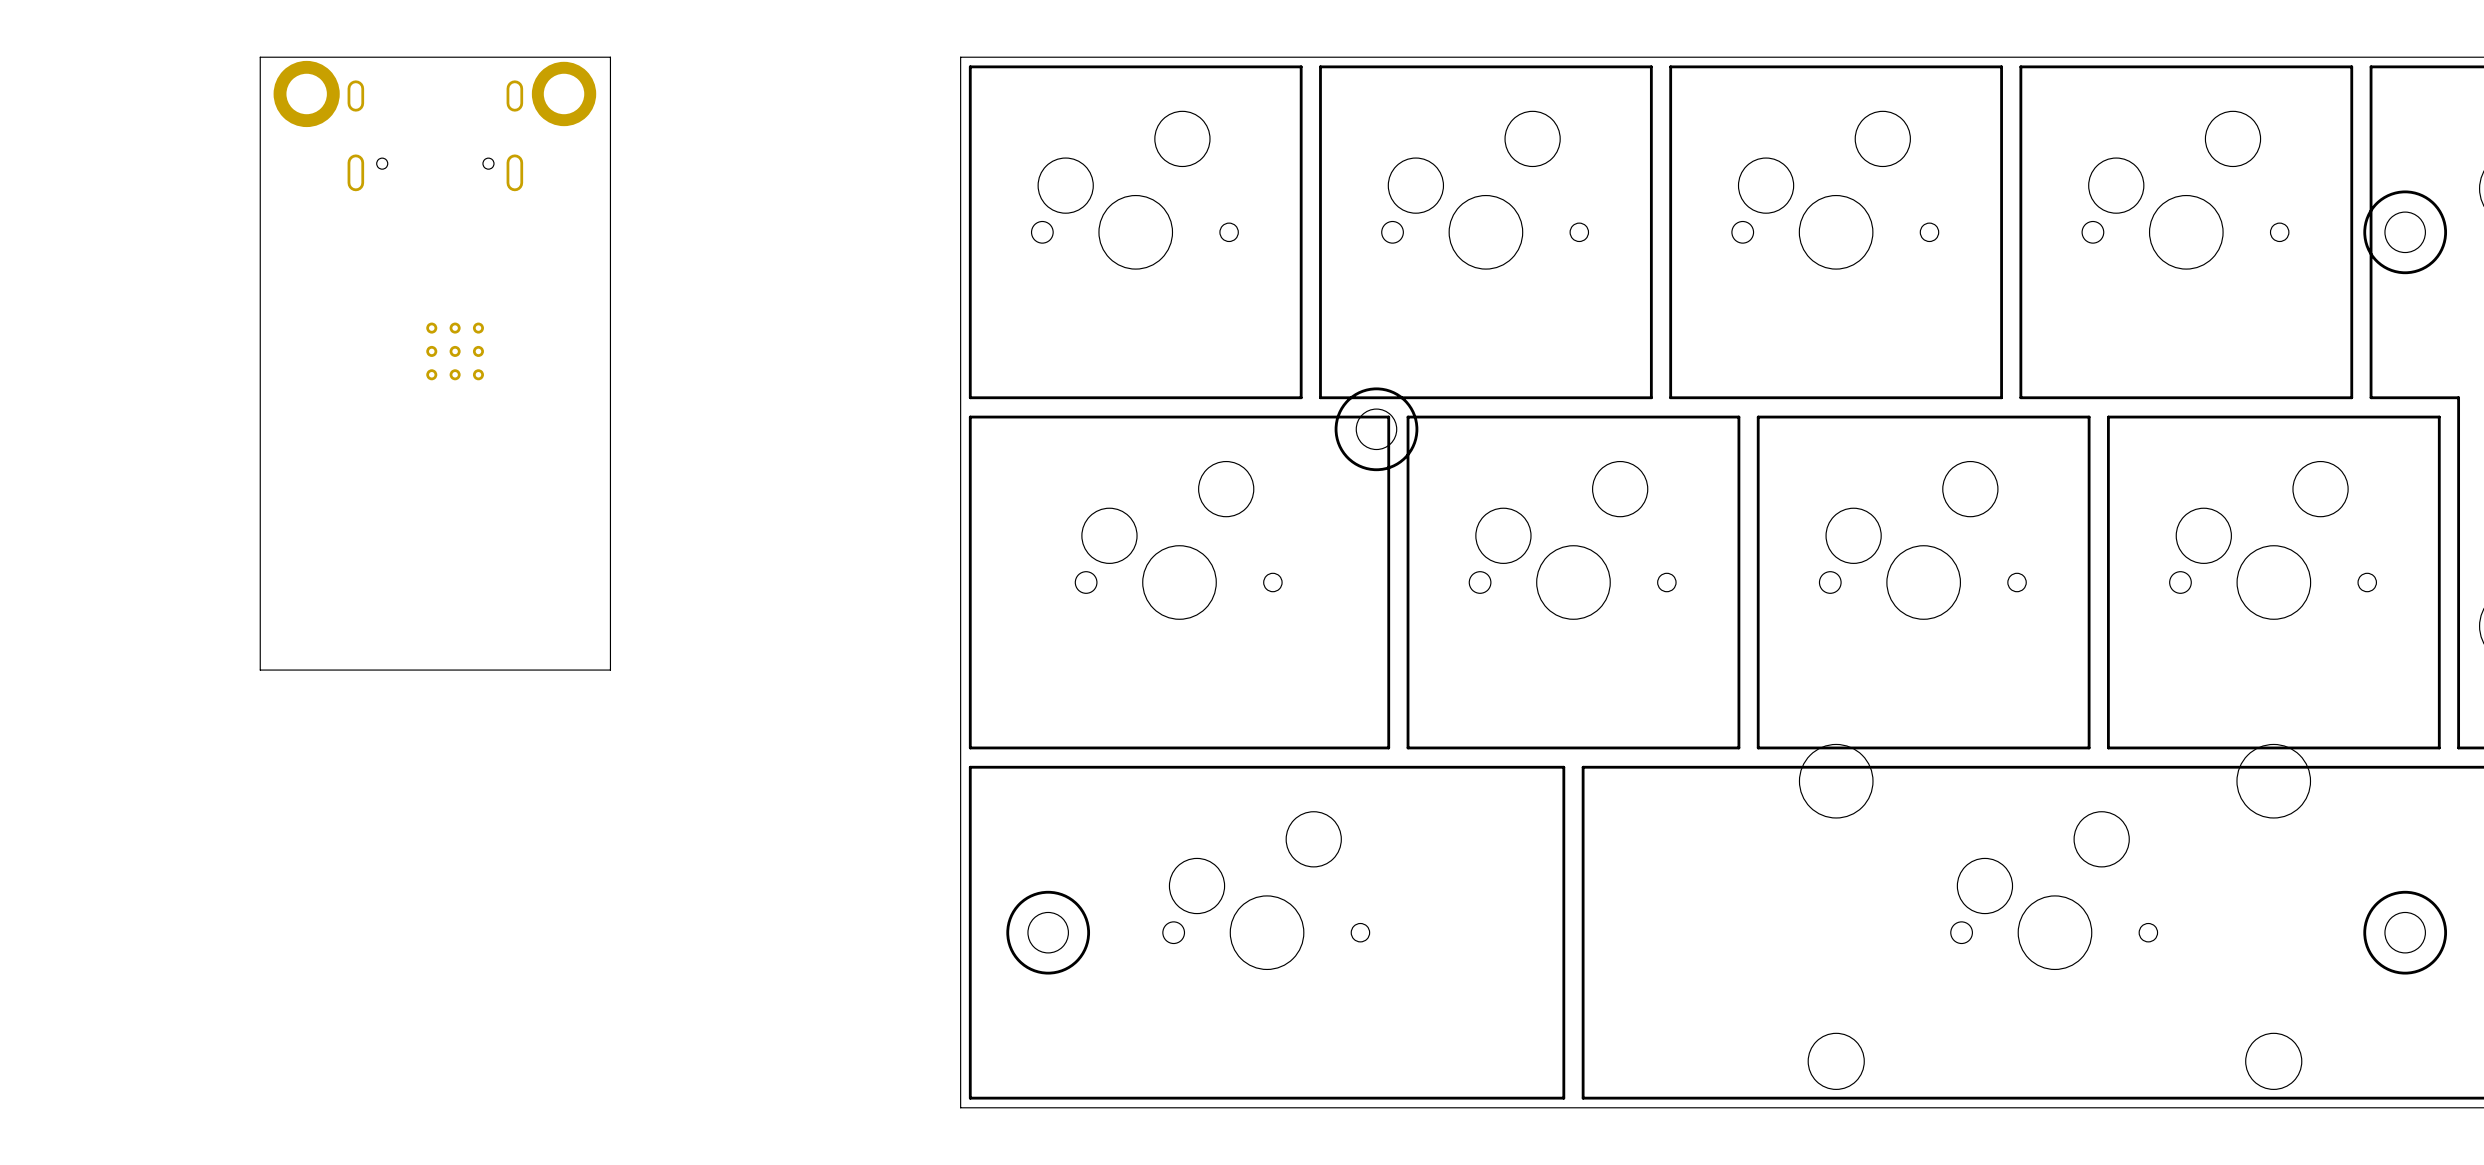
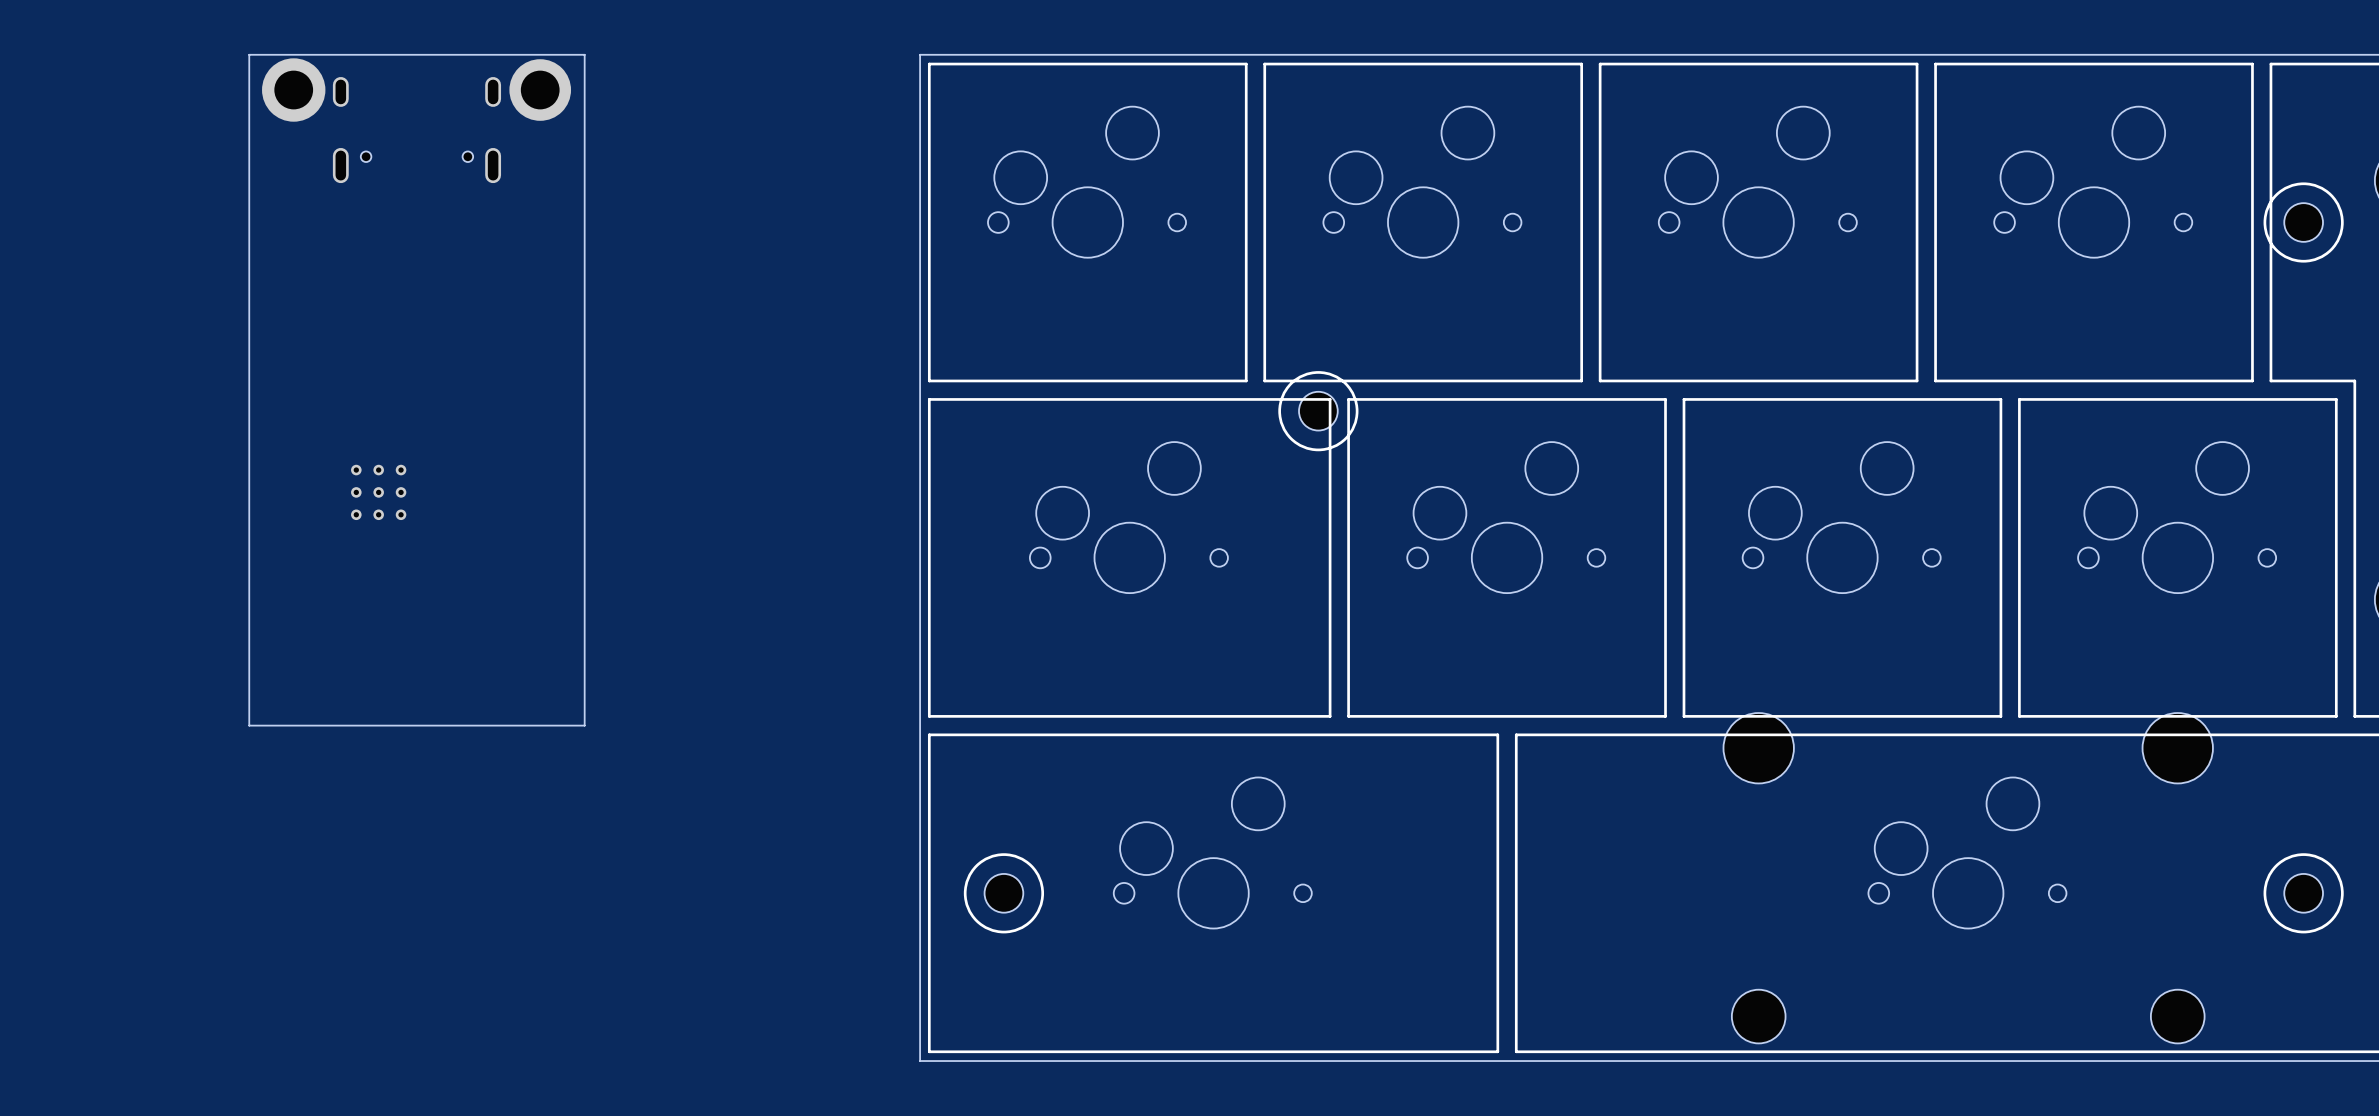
part position: (455, 351) -> (378, 492)
board edge: (610, 670) (260, 670) -> (584, 641) (584, 725) (249, 725) (249, 641)

